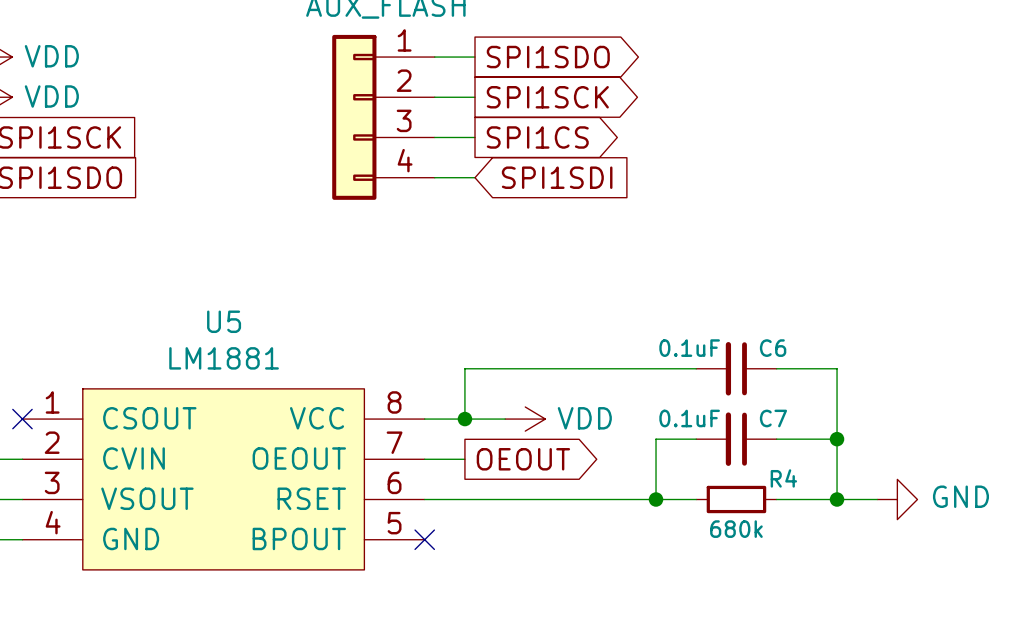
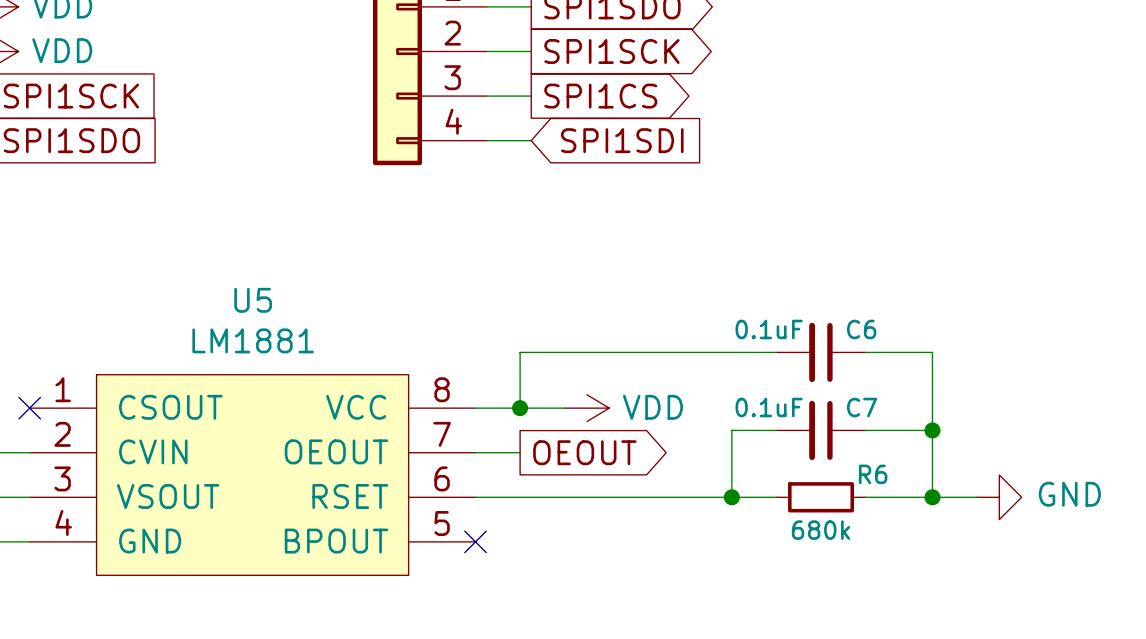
R4 name: R4 (783, 478) -> R6 (873, 474)

